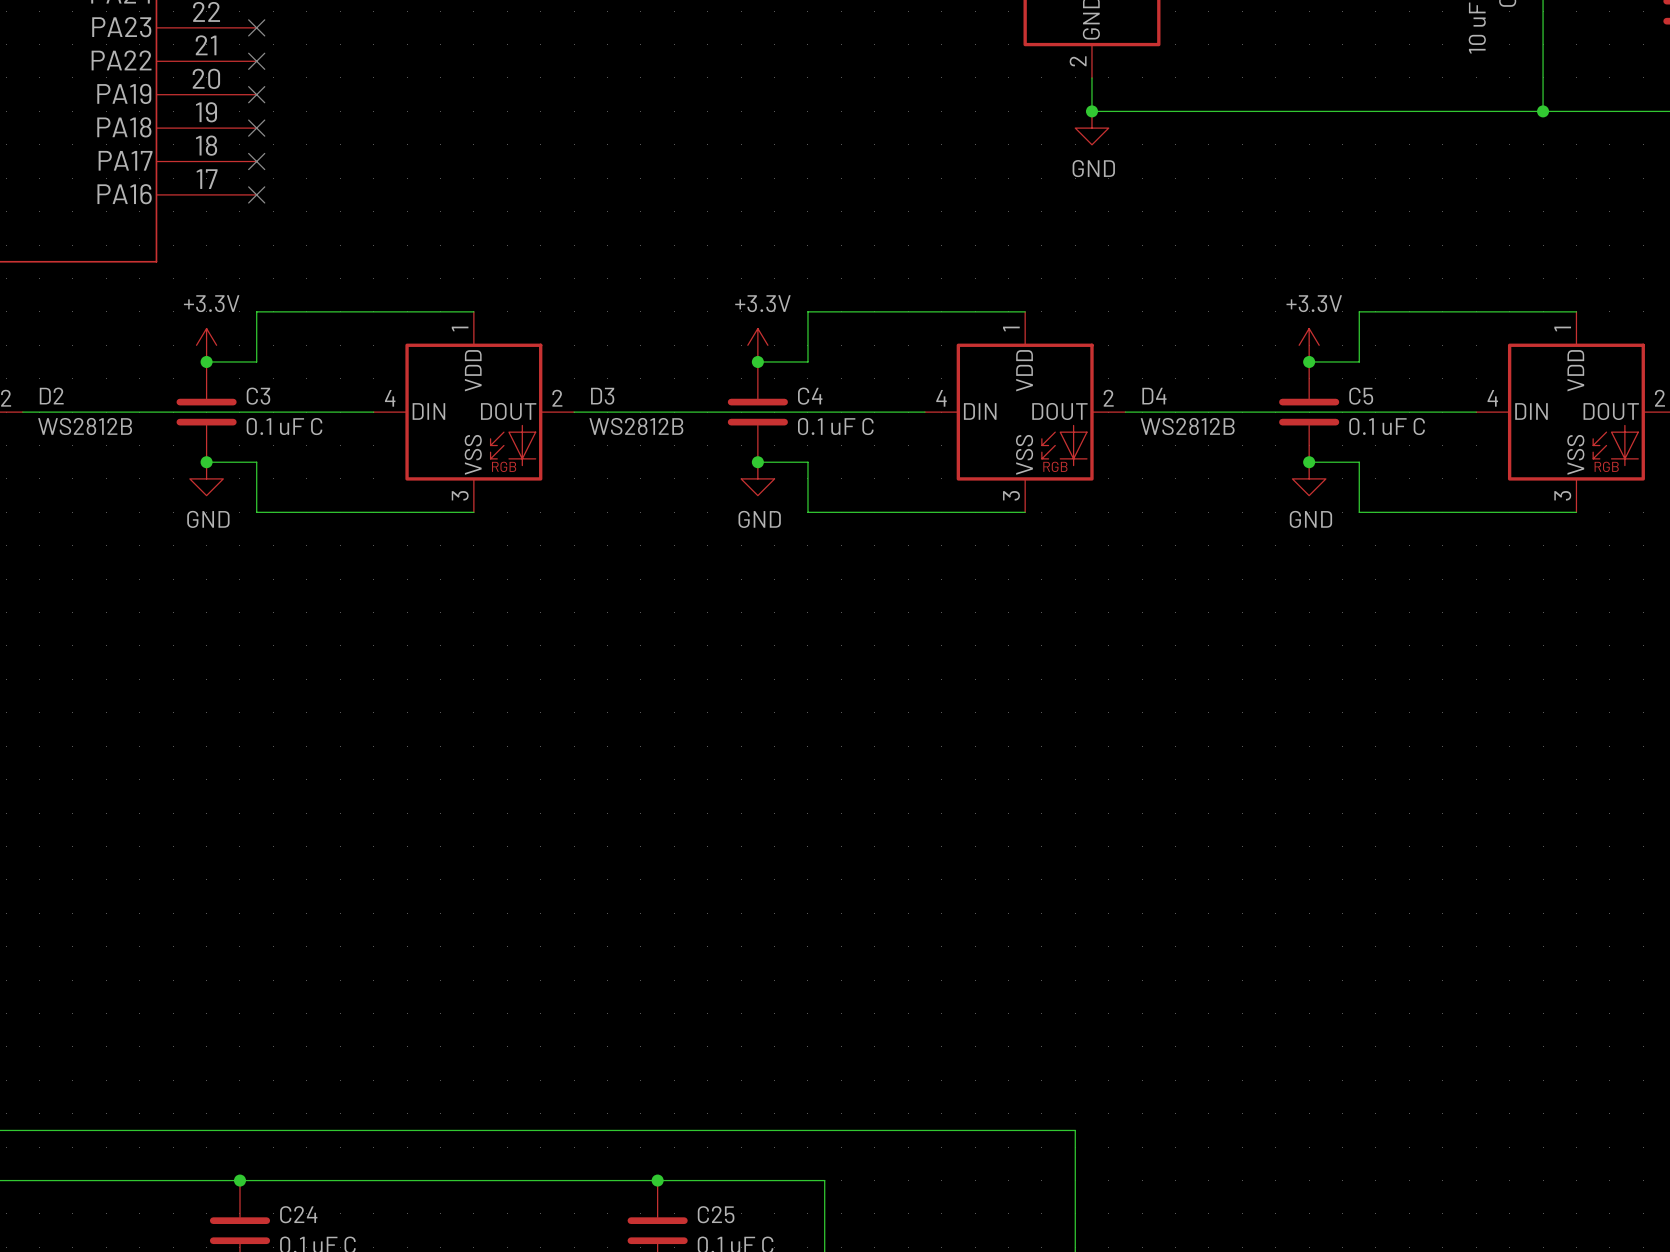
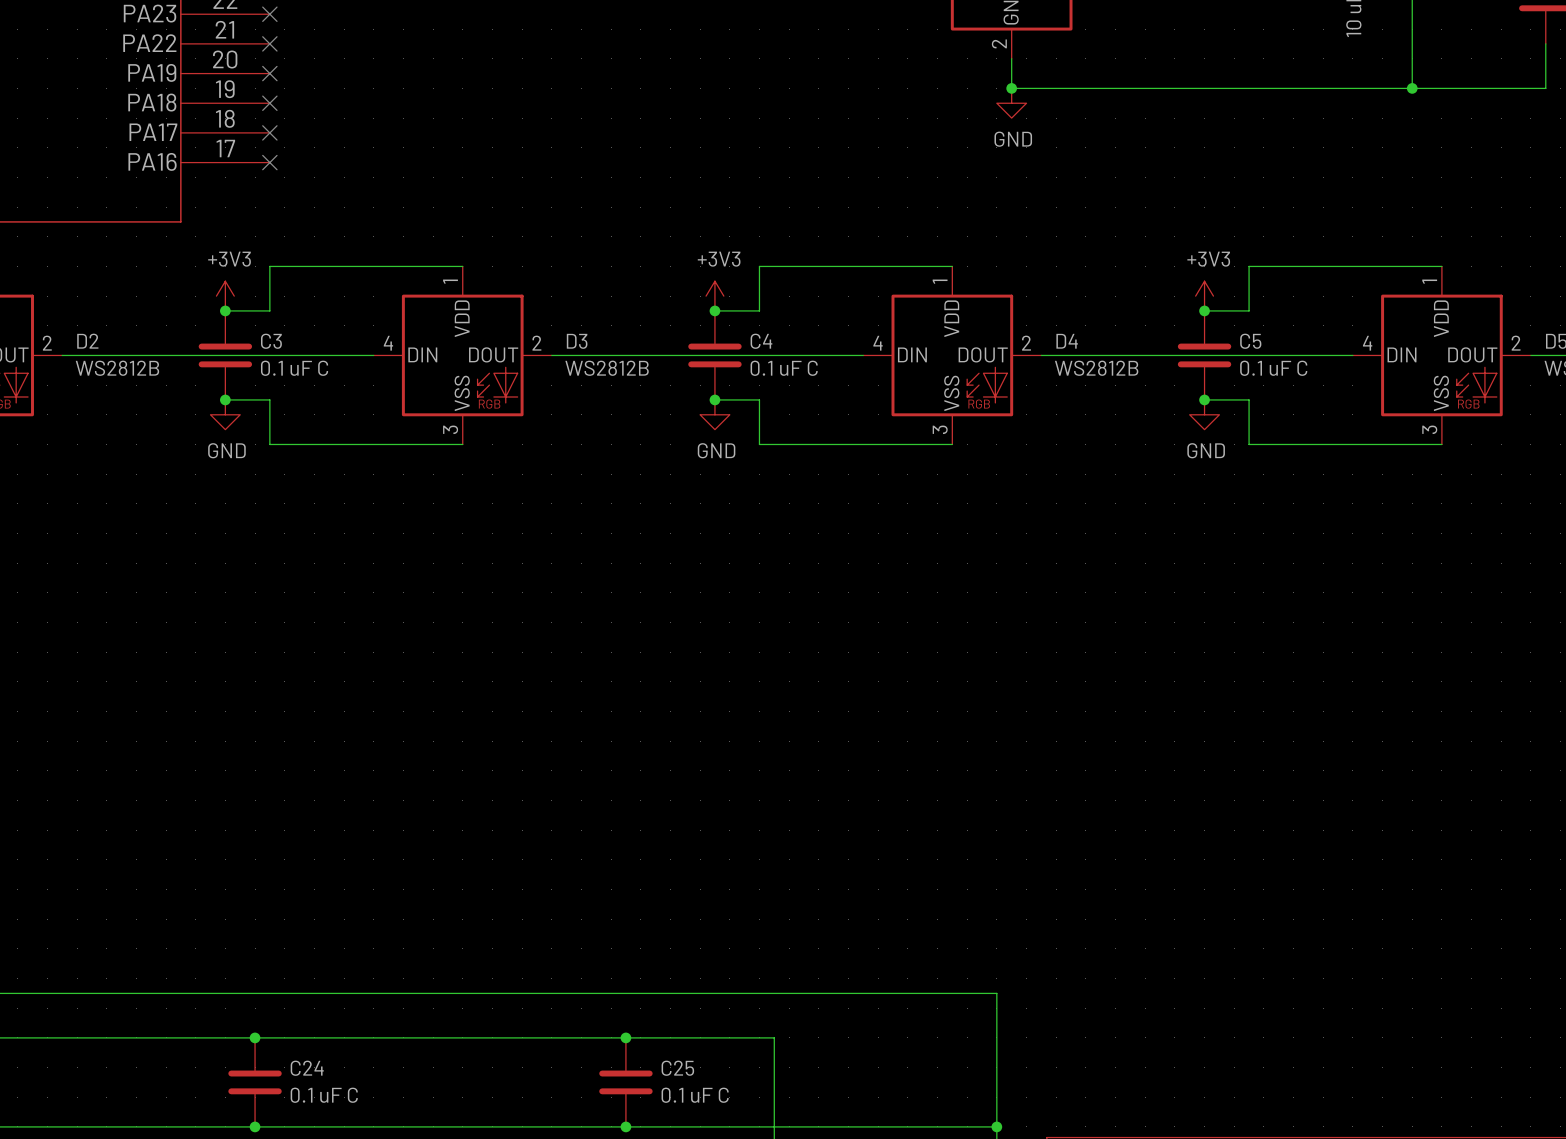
power symbol: +3.3V (206, 345) -> +3V3 (225, 296)
power symbol: +3.3V (757, 345) -> +3V3 (714, 296)
power symbol: +3.3V (1309, 345) -> +3V3 (1204, 296)

